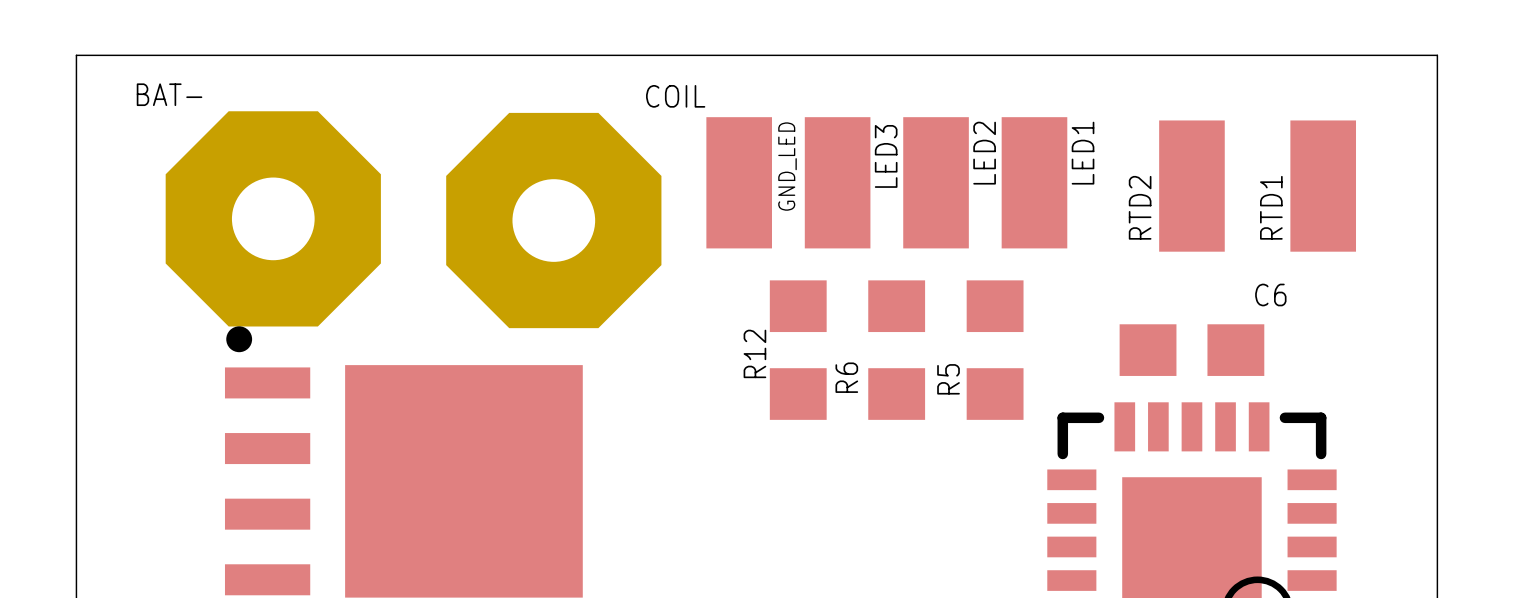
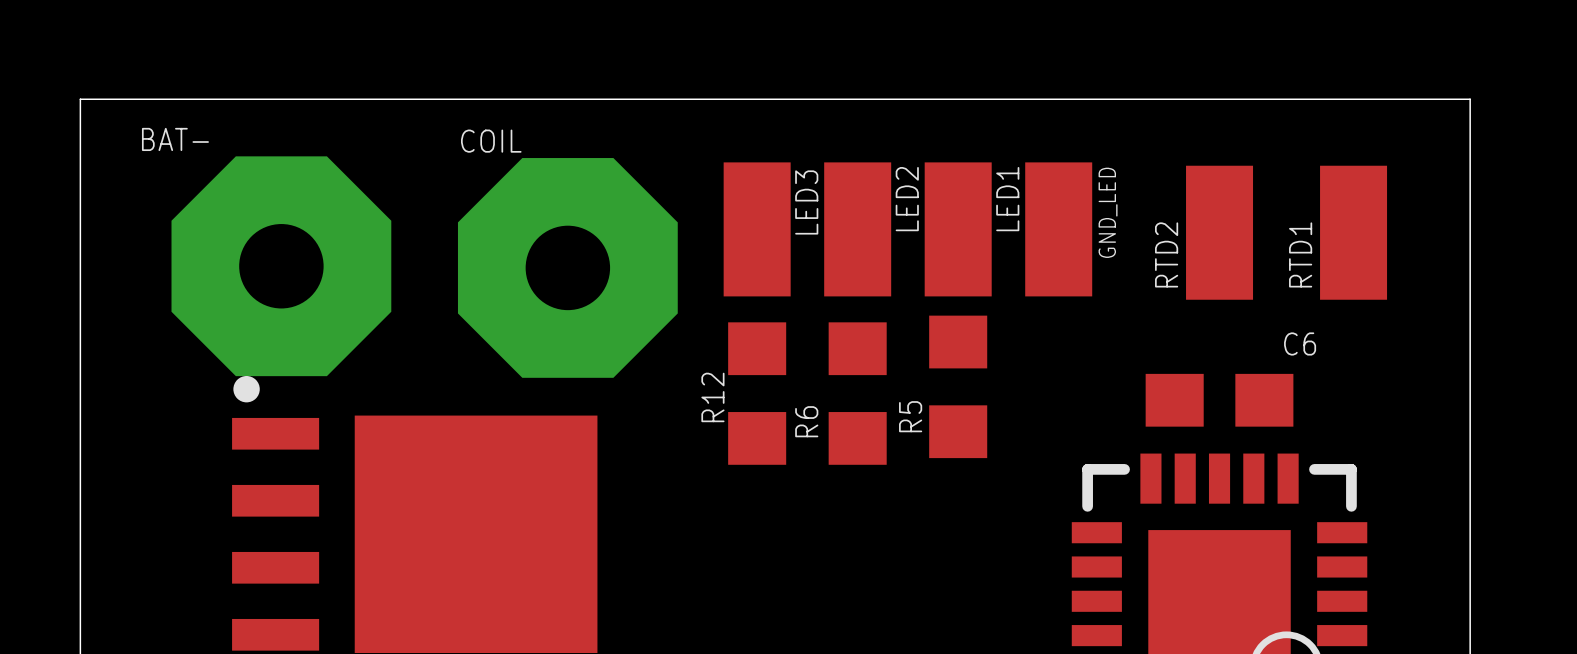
COIL name position: COIL (675, 96) -> COIL (491, 141)
LED2 name: LED2 (984, 153) -> LED1 (1007, 199)
LED1 name: LED1 (1083, 153) -> GND_LED (1108, 212)
LED3 name: LED3 (886, 156) -> LED2 (907, 199)
GND_LED name: GND_LED (787, 166) -> LED3 (806, 202)
R12 position: (798, 350) -> (757, 393)
R6 position: (896, 350) -> (857, 393)
R5 position: (995, 350) -> (958, 386)

